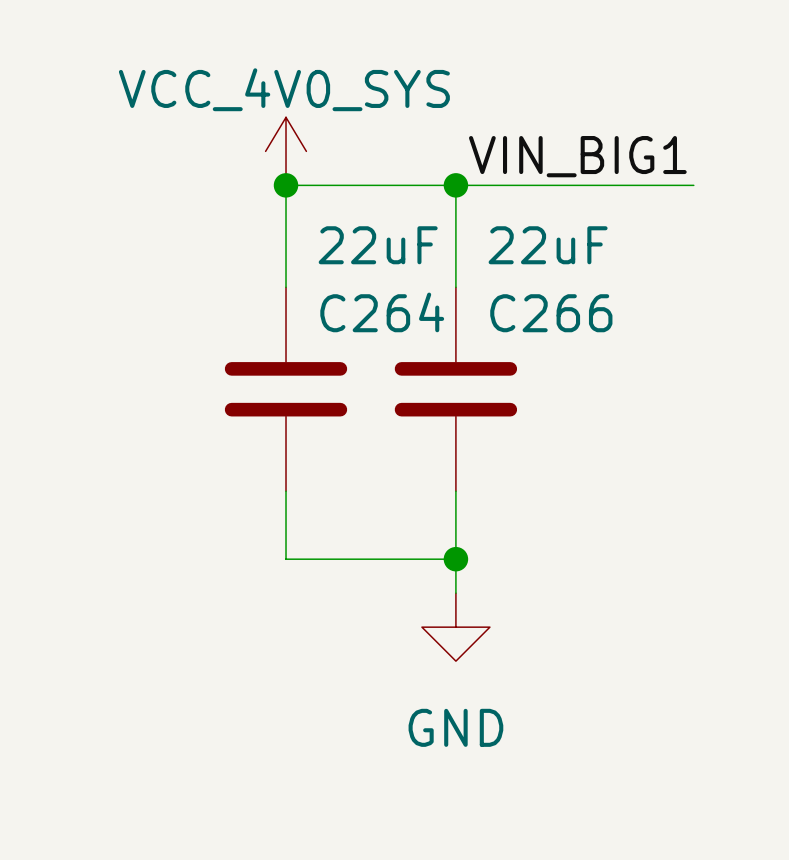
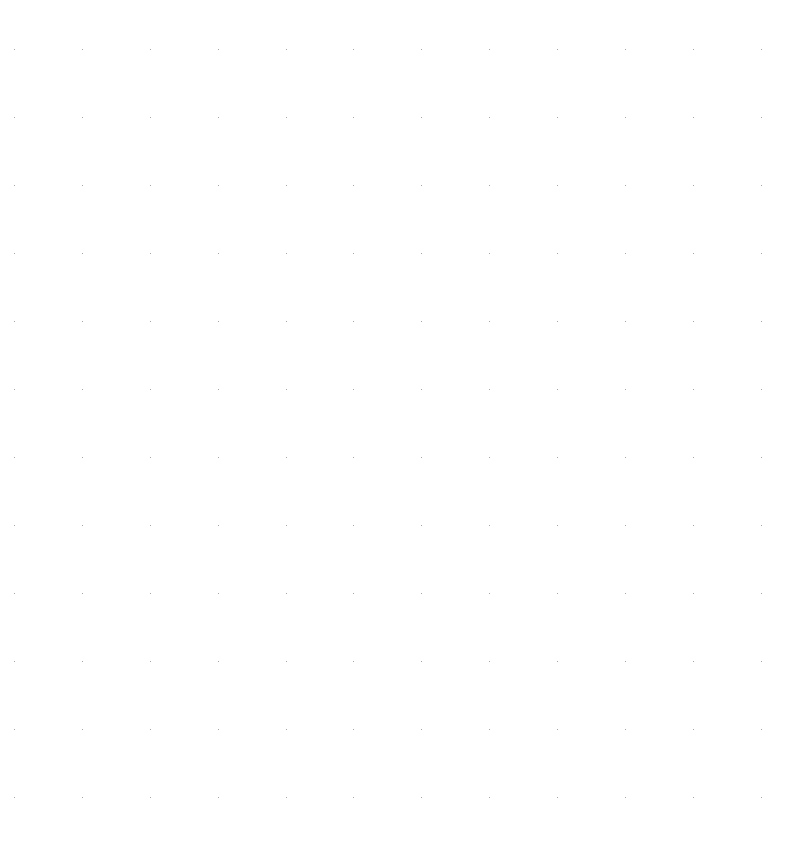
power symbol: VCC_4V0_SYS (286, 151) -> none
label: VIN_BIG1 (577, 156) -> none
junction: (286, 185) -> none
wire: (455, 185) (455, 287) -> none
junction: (455, 185) -> none
wire: (693, 185) (286, 185) (286, 287) -> none
C264: 22uF (286, 389) -> none
C266: 22uF (455, 389) -> none
wire: (286, 491) (286, 559) (455, 559) -> none
wire: (455, 491) (455, 593) -> none
junction: (455, 559) -> none
power symbol: GND (455, 627) -> none

